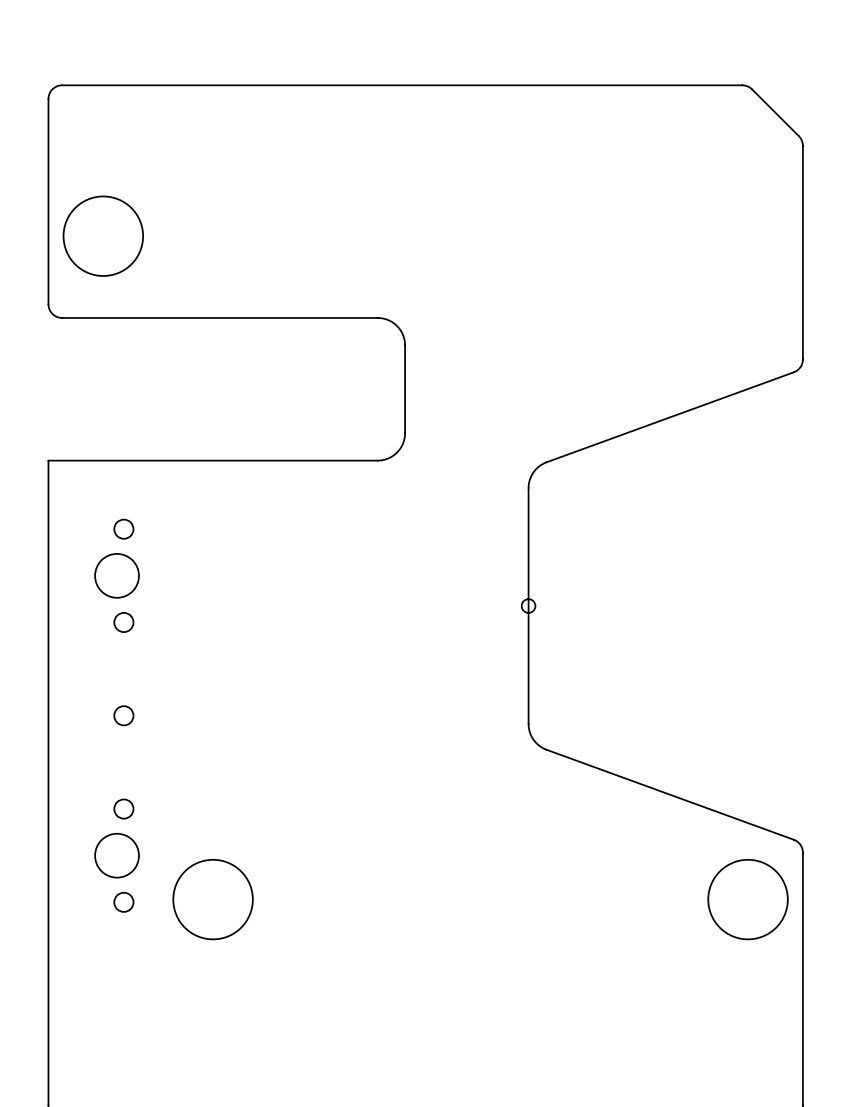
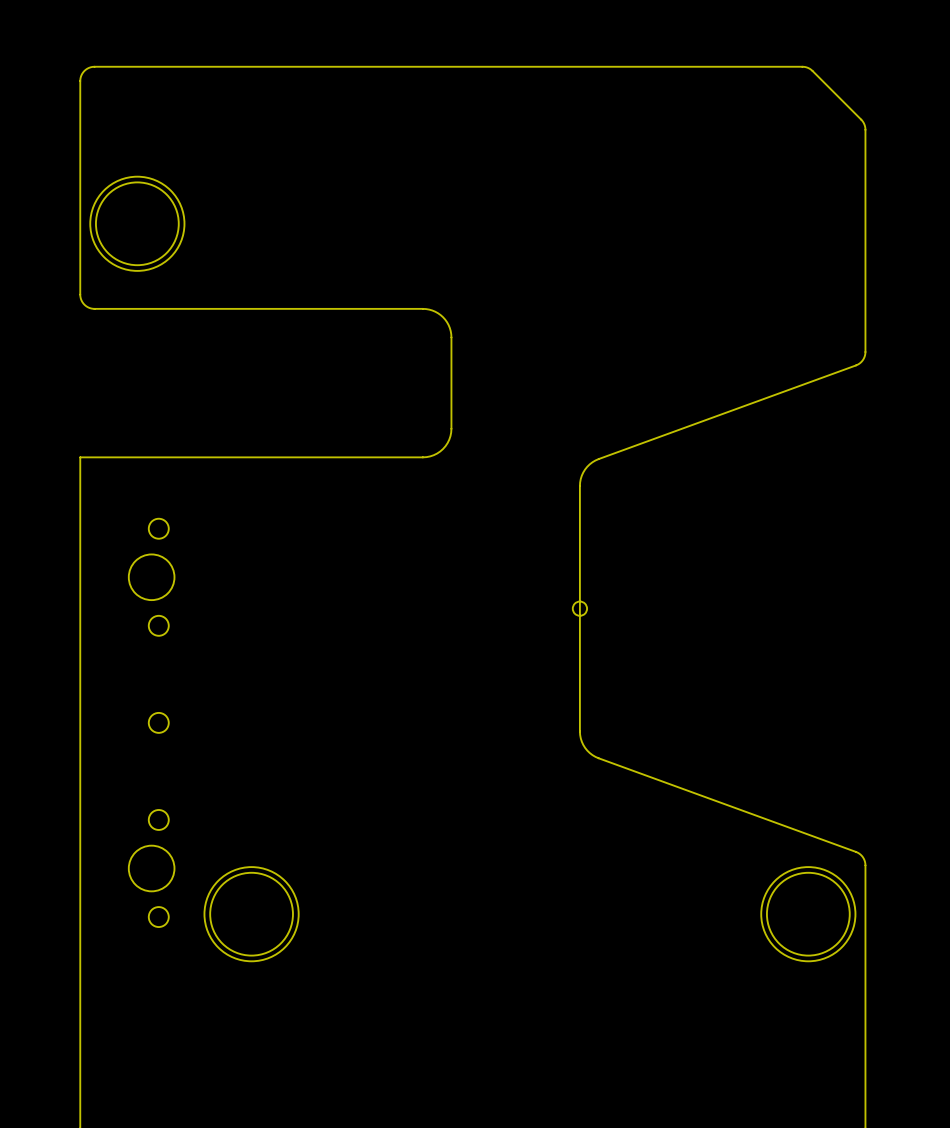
round board edge: none -> [90, 176, 185, 272]
round board edge: none -> [204, 866, 299, 962]
round board edge: none -> [761, 866, 856, 962]

